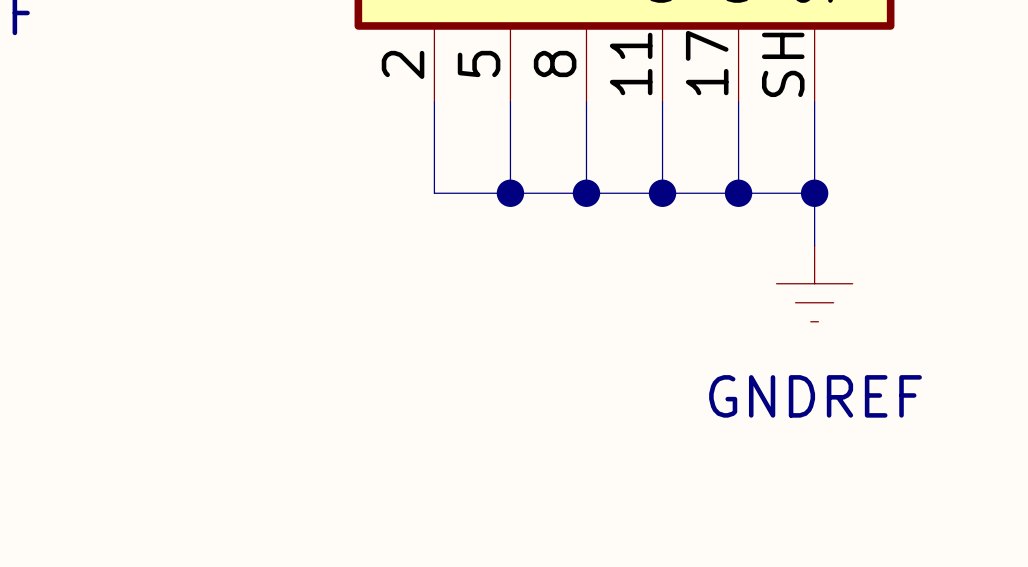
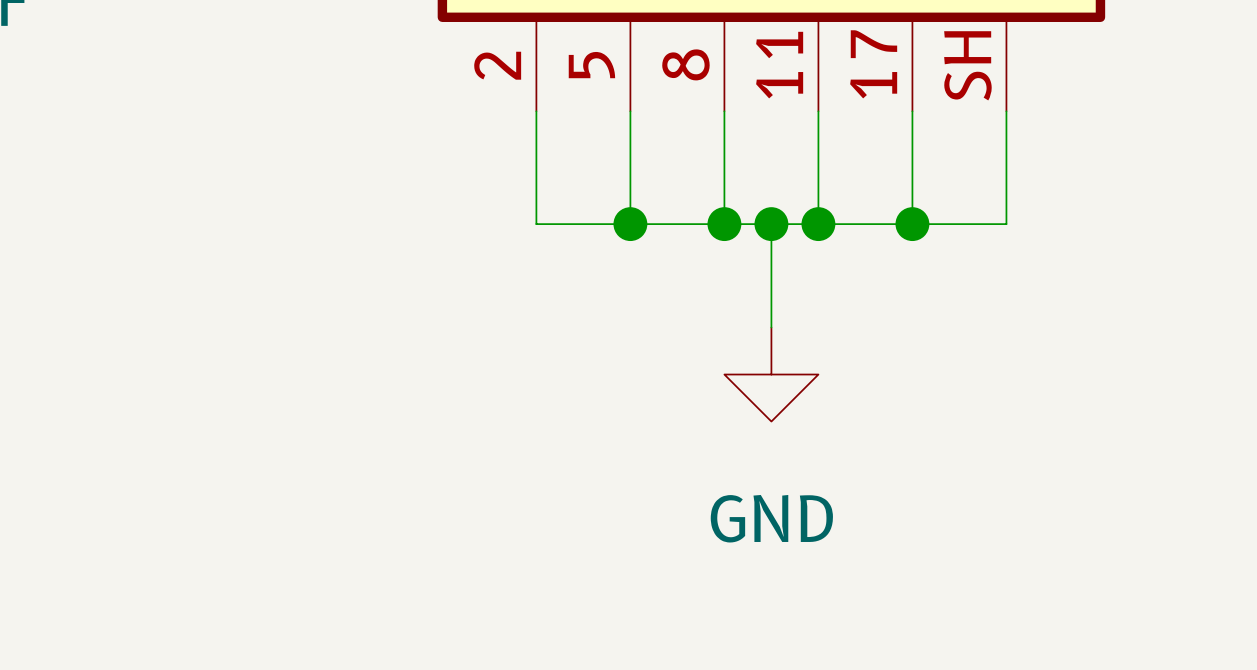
wire: none -> (771, 224) (771, 327)
junction: none -> (771, 224)
wire: (814, 193) (814, 245) -> none
junction: (814, 193) -> none
power symbol: GNDREF (814, 283) -> none
power symbol: none -> GND (771, 374)

